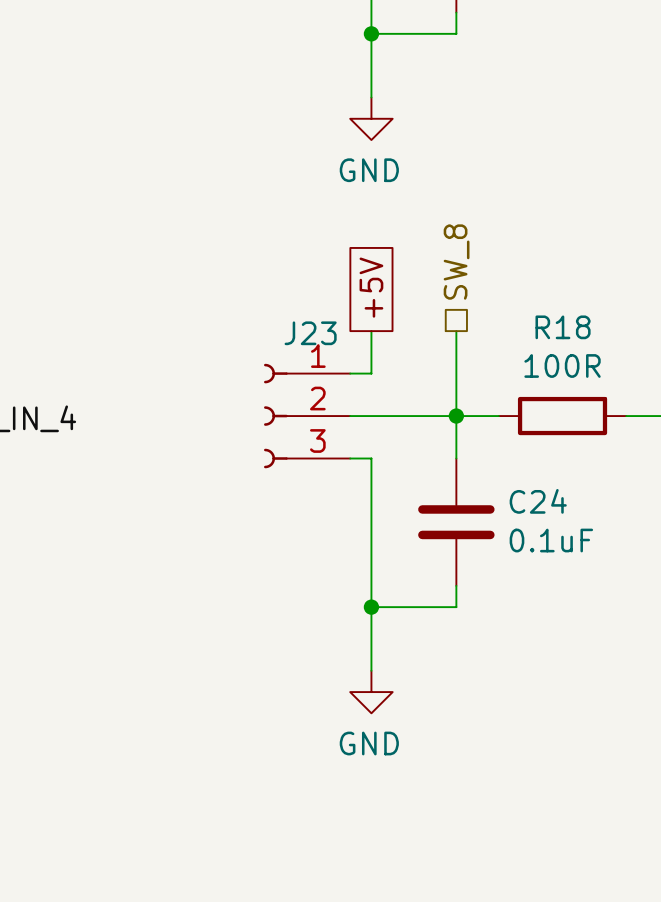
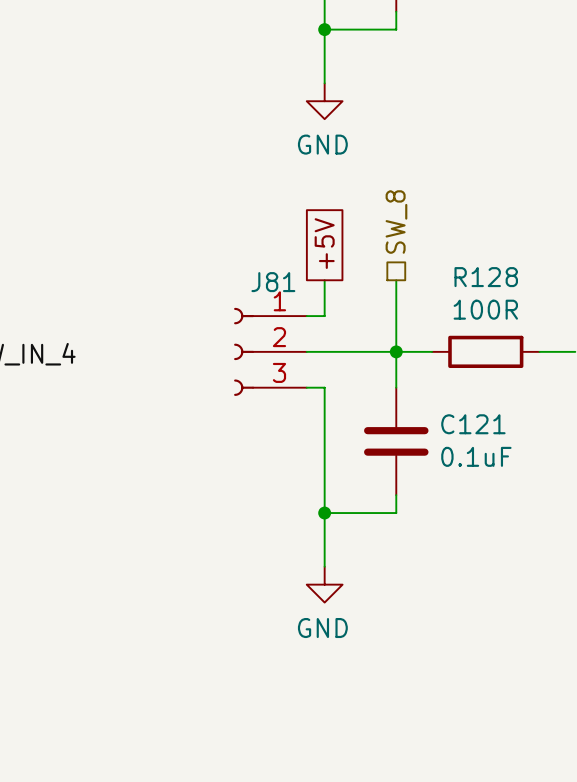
R18 name: R18 (563, 327) -> R128 (486, 277)
J23 name: J23 (310, 333) -> J81 (273, 282)
C24 name: C24 (538, 501) -> C121 (473, 424)

